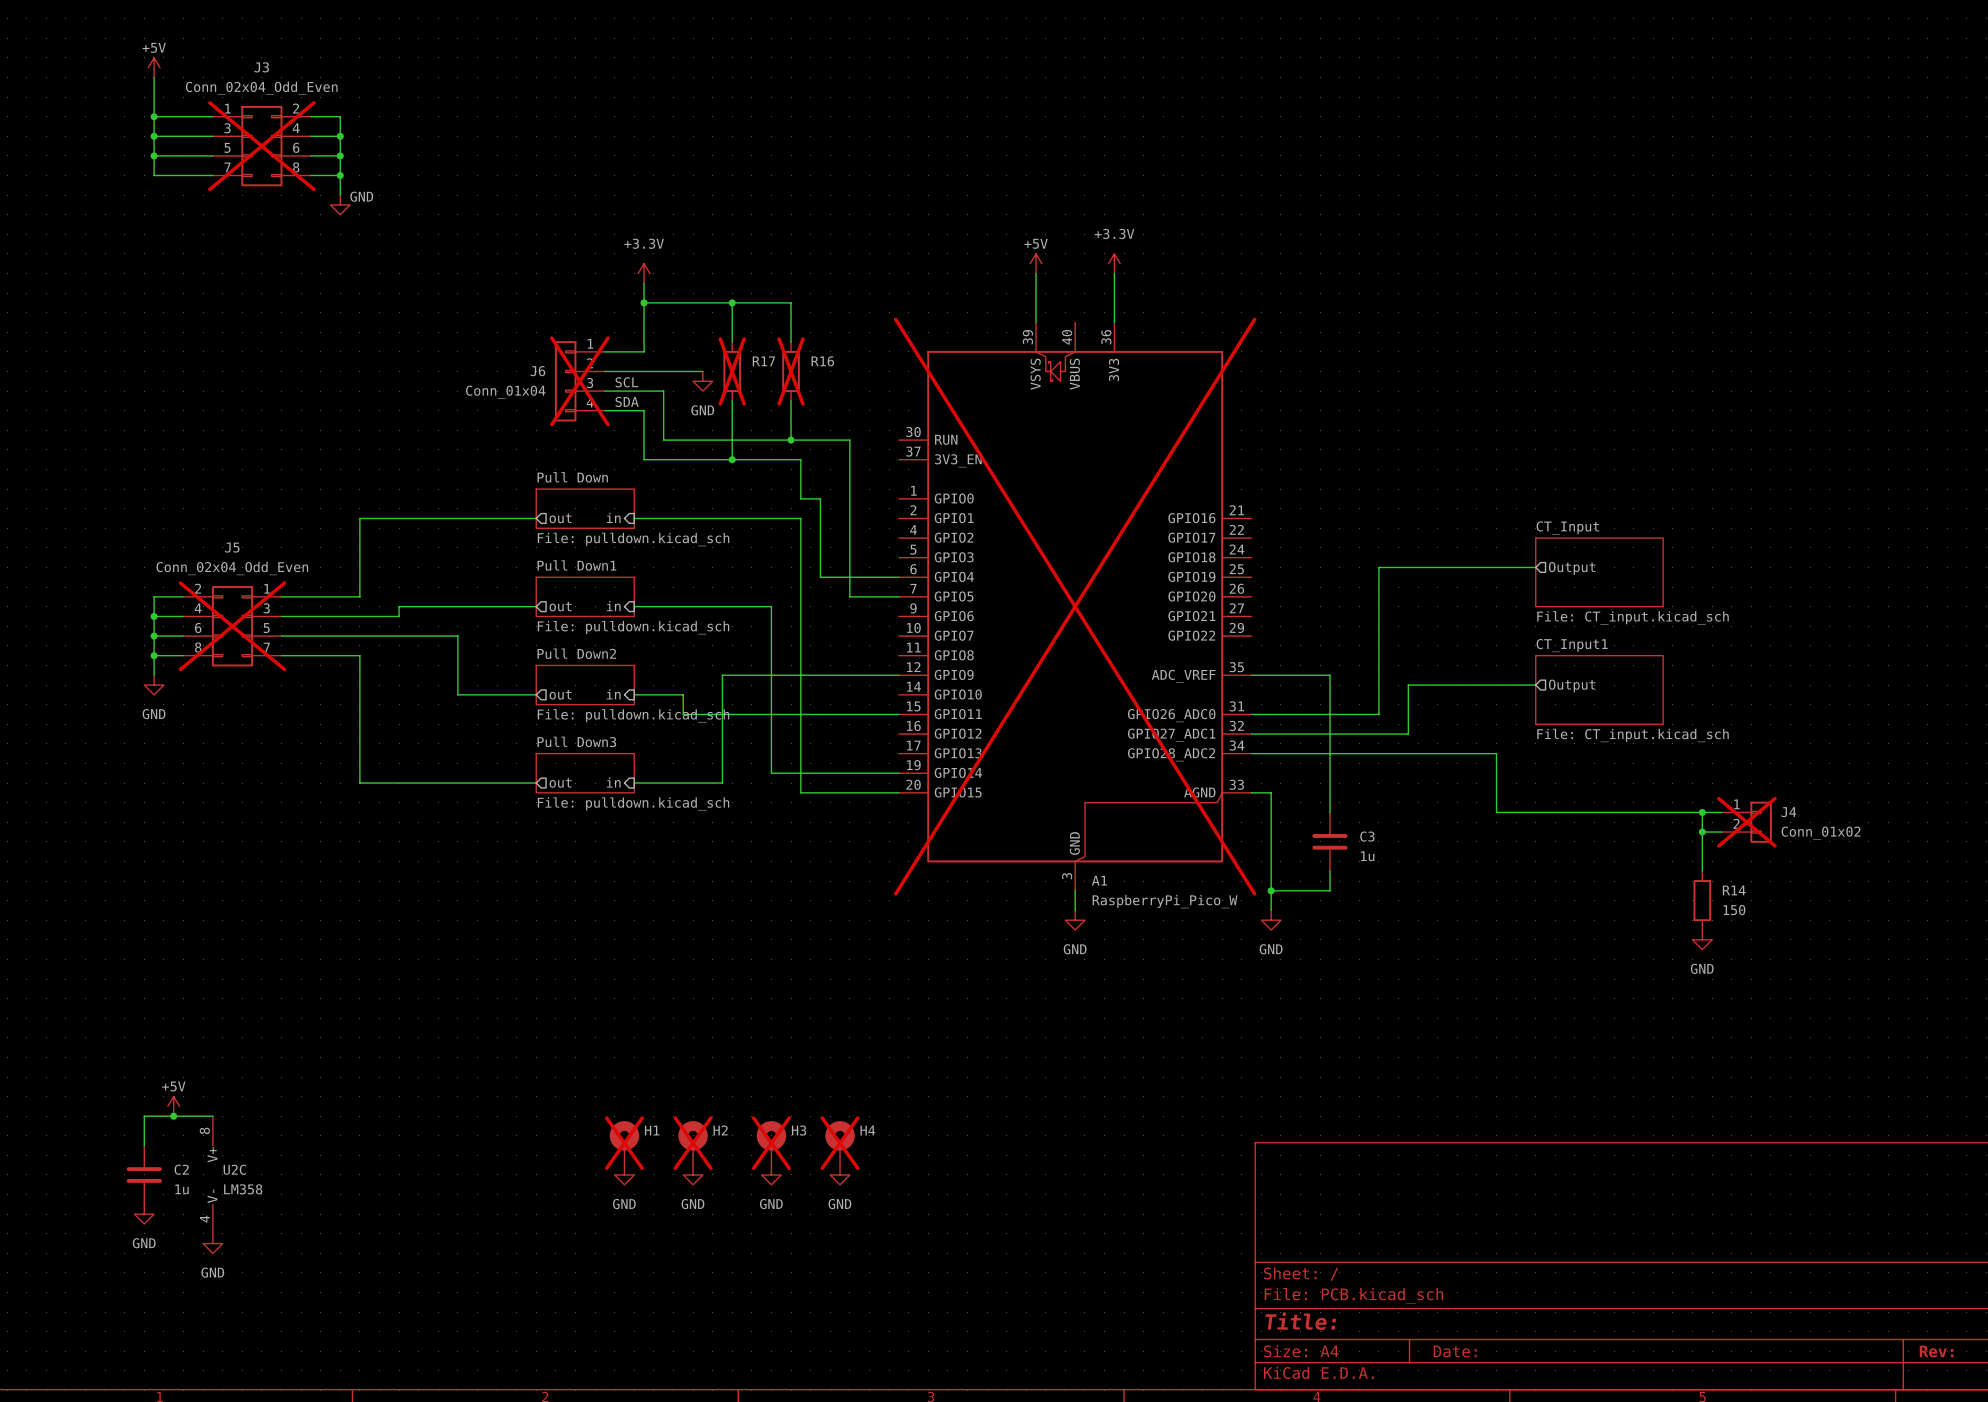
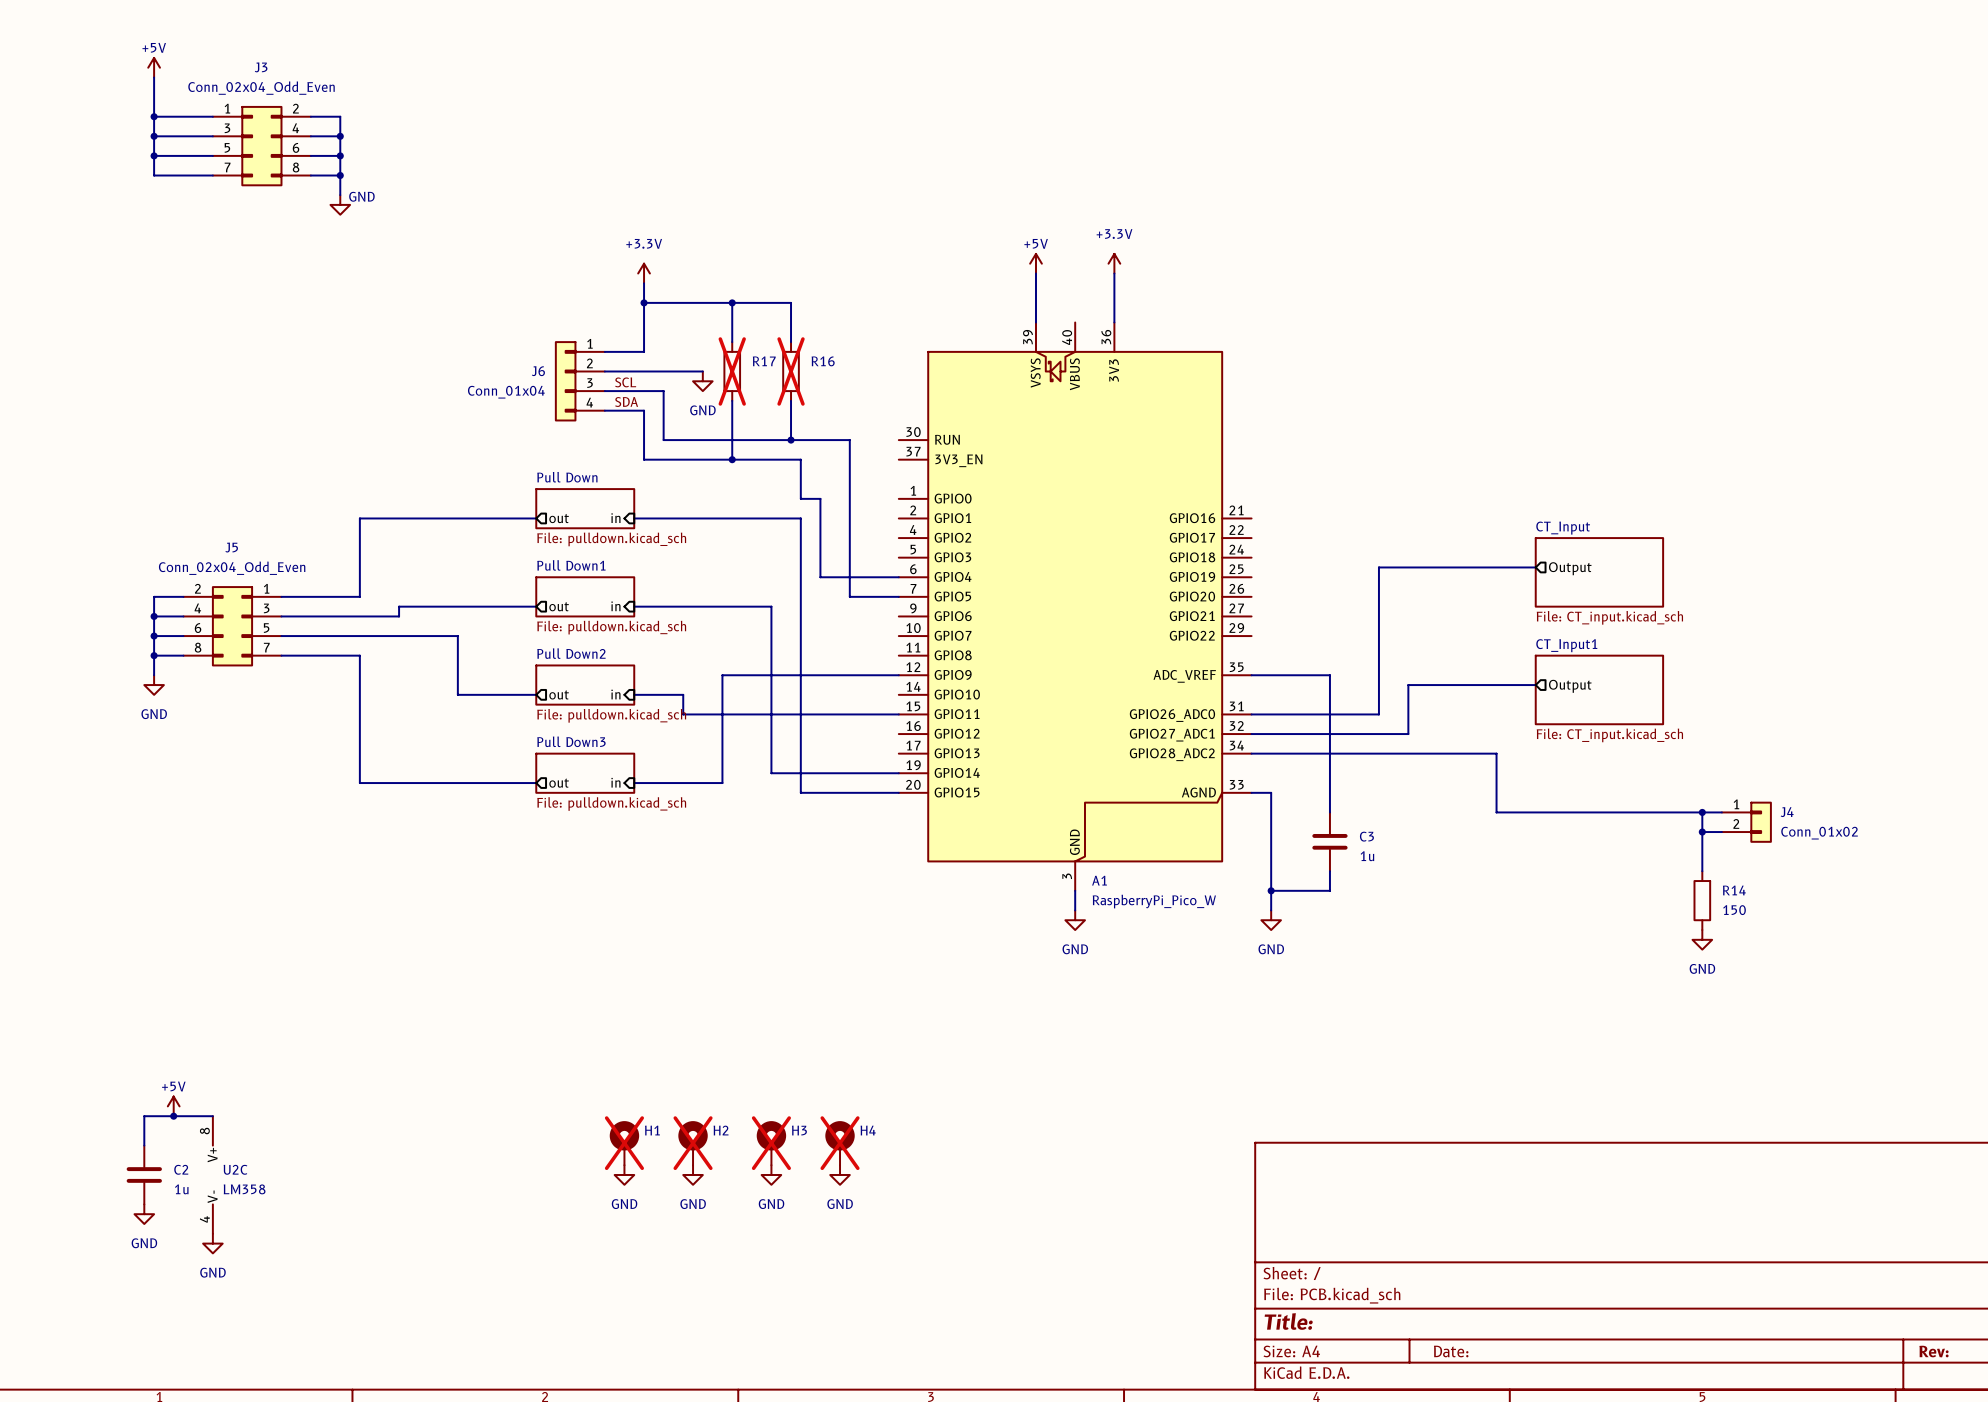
J3 do-not-place cross: (261, 146) -> none
J6 do-not-place cross: (579, 381) -> none
A1 do-not-place cross: (1075, 606) -> none
J5 do-not-place cross: (232, 626) -> none
J4 do-not-place cross: (1746, 822) -> none

